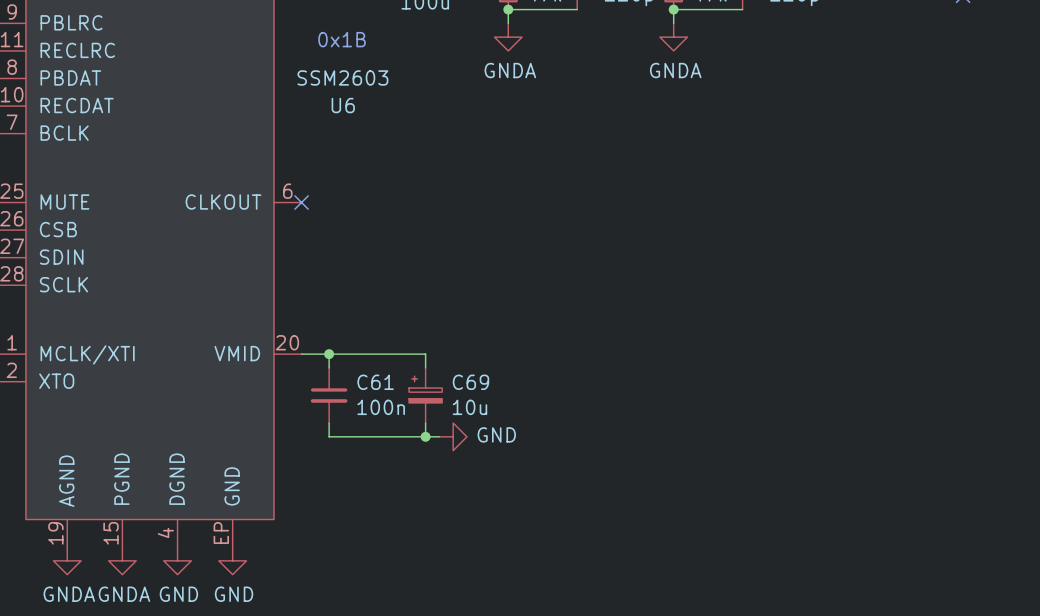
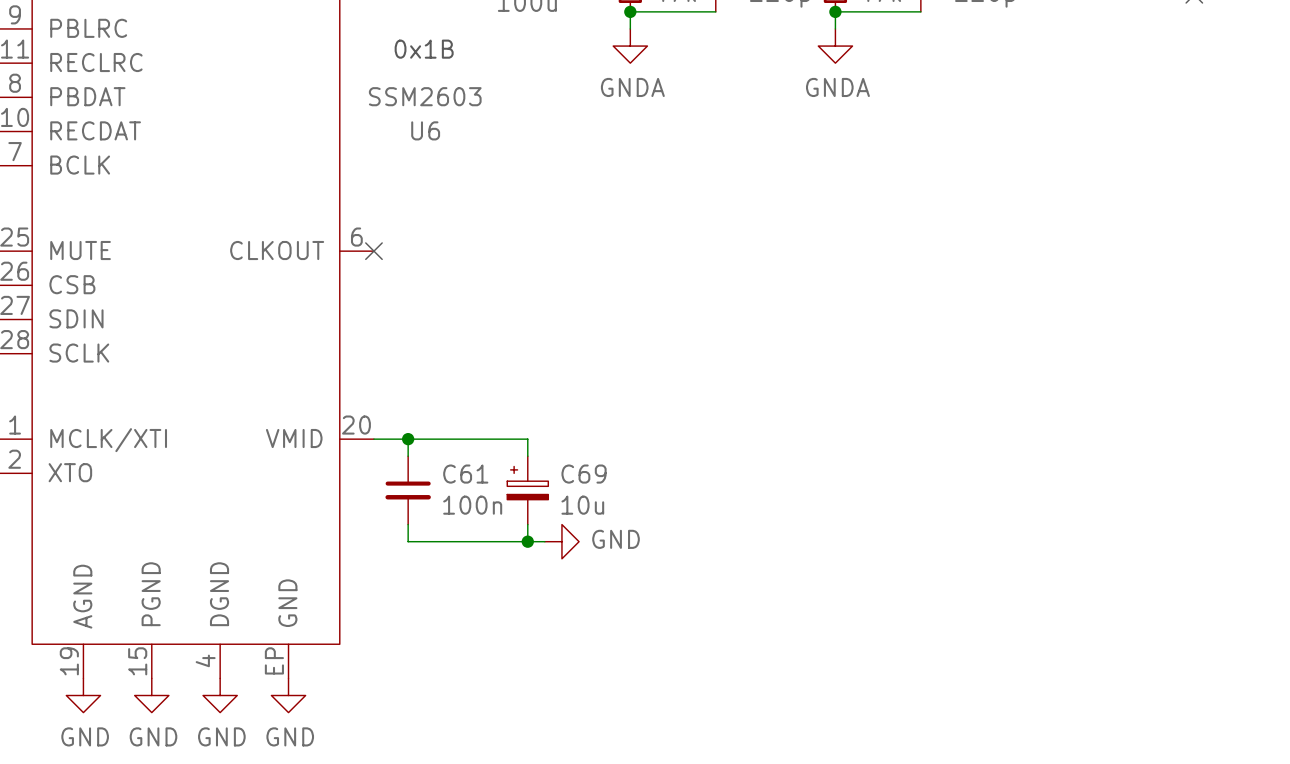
power symbol: GNDA (67, 560) -> GND (83, 695)
power symbol: GNDA (122, 560) -> GND (151, 695)

